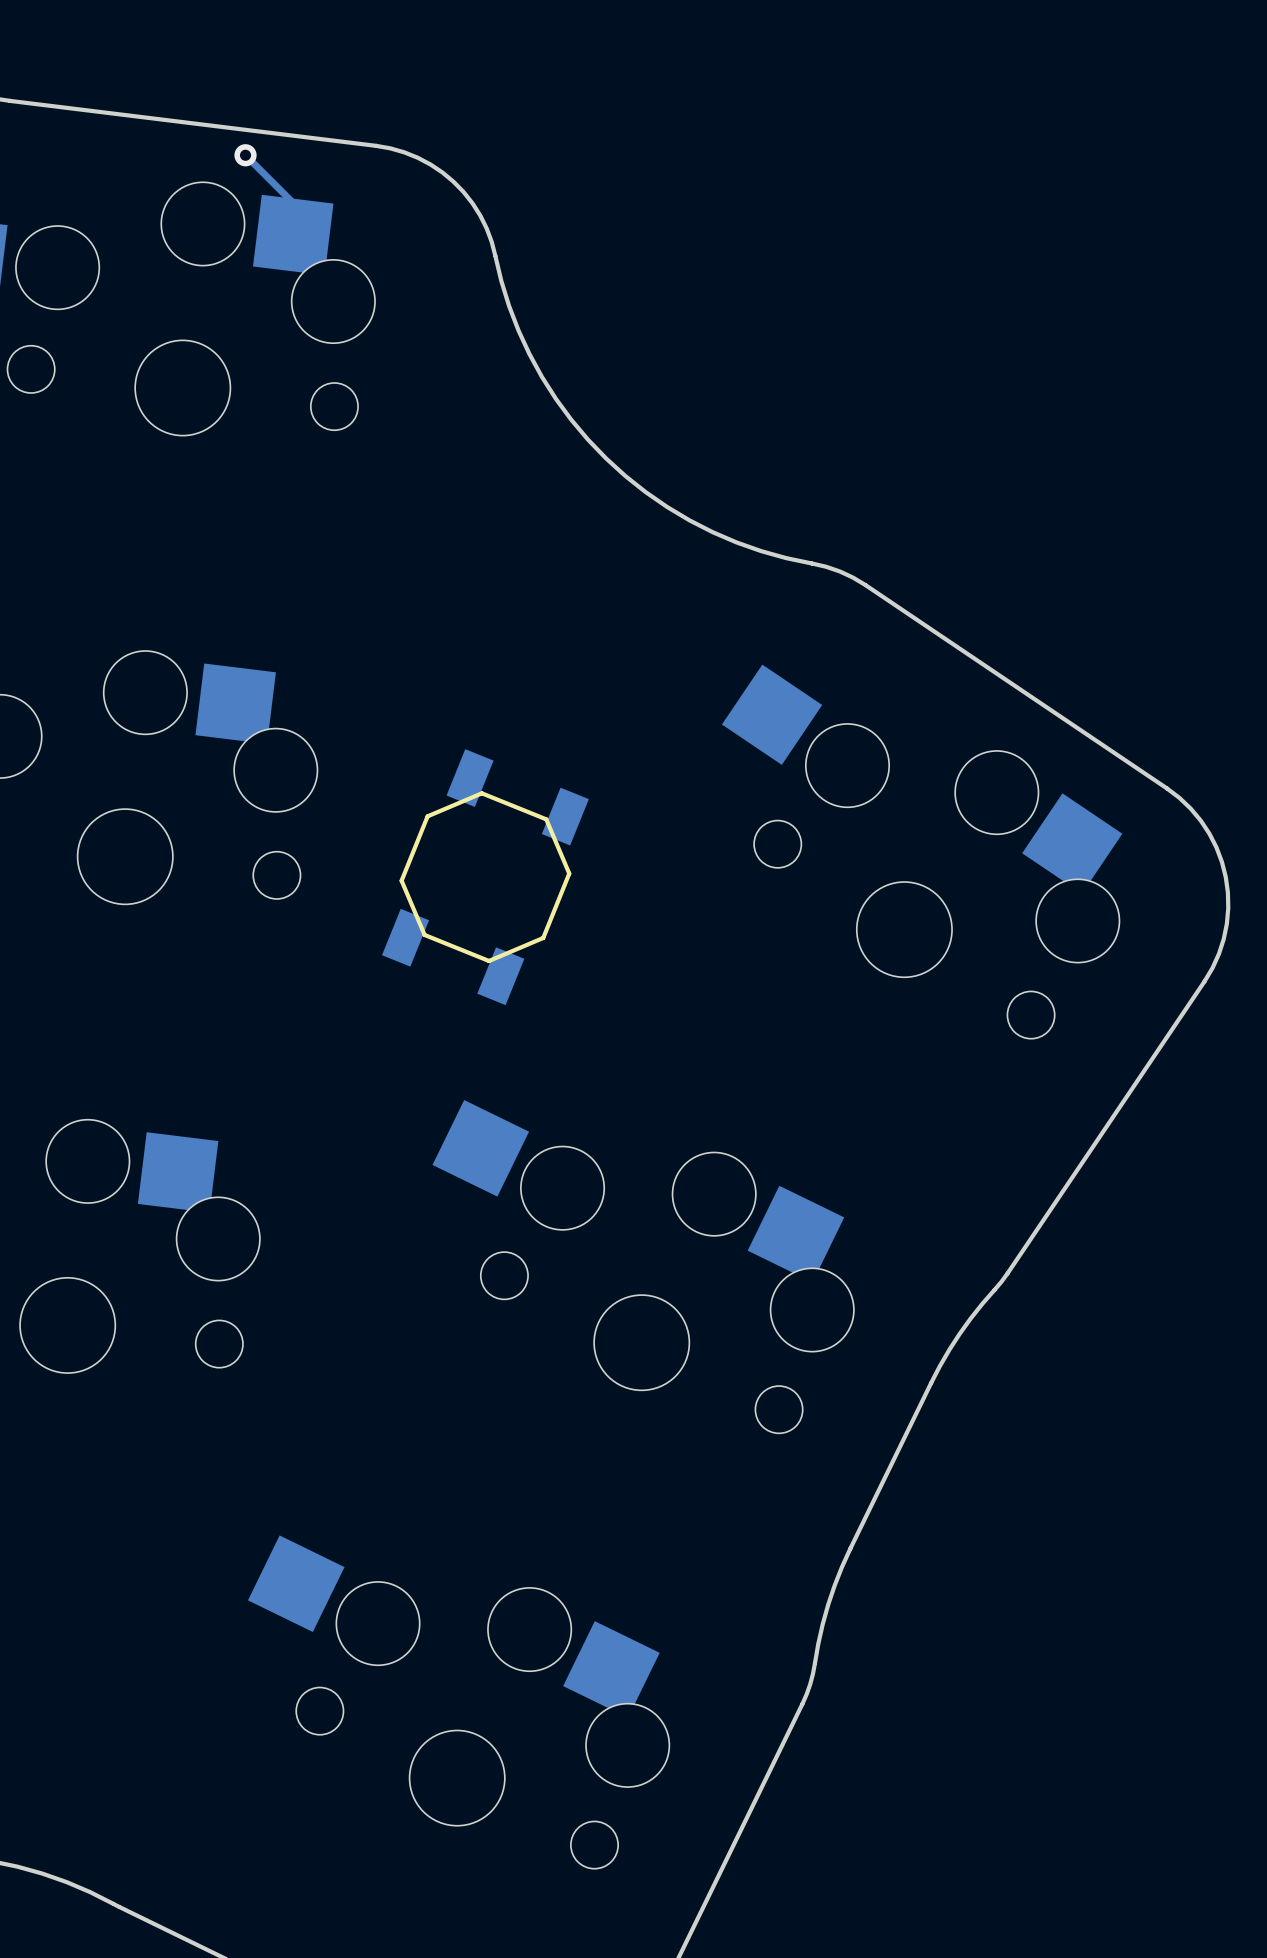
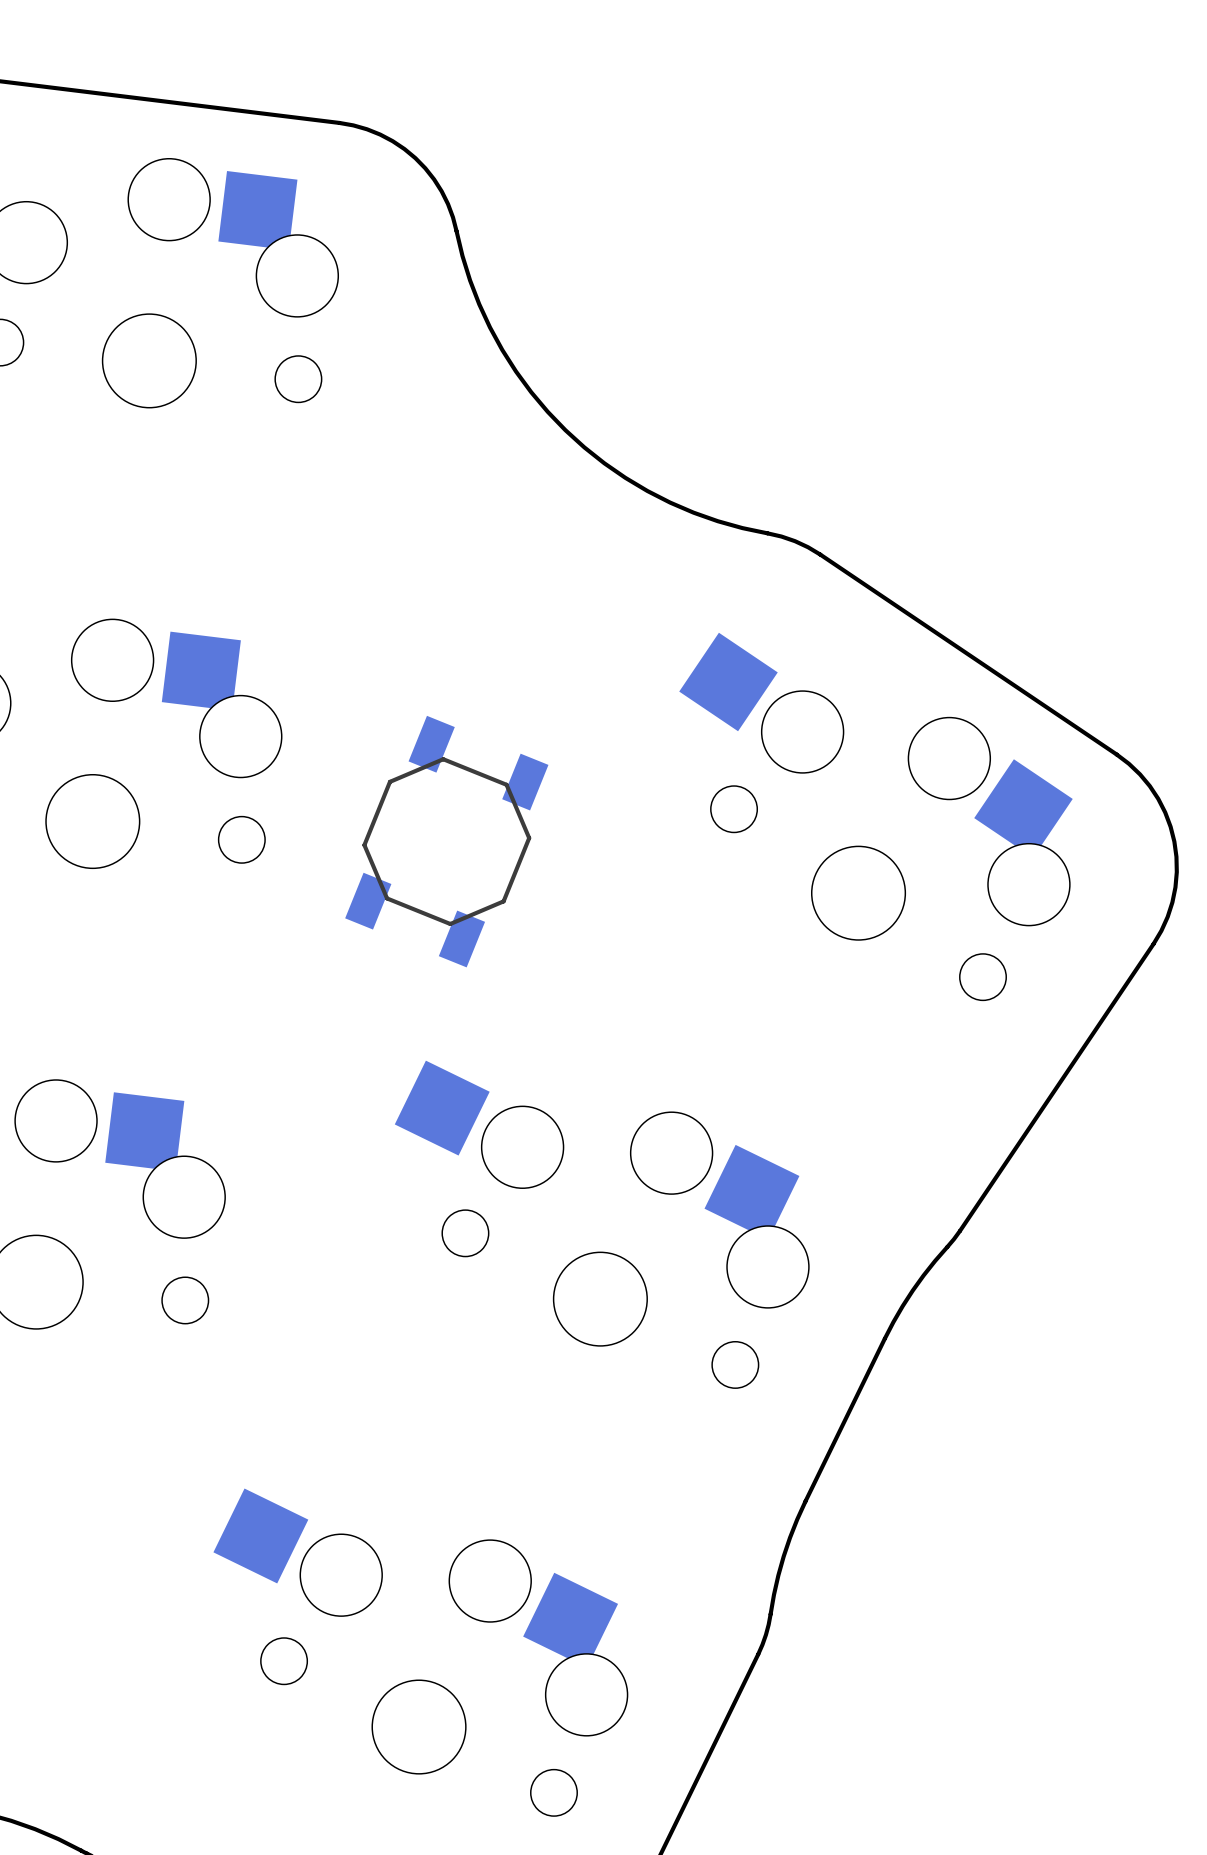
track: (245, 155) (293, 202) (293, 235) -> none
via: (245, 155) -> none

